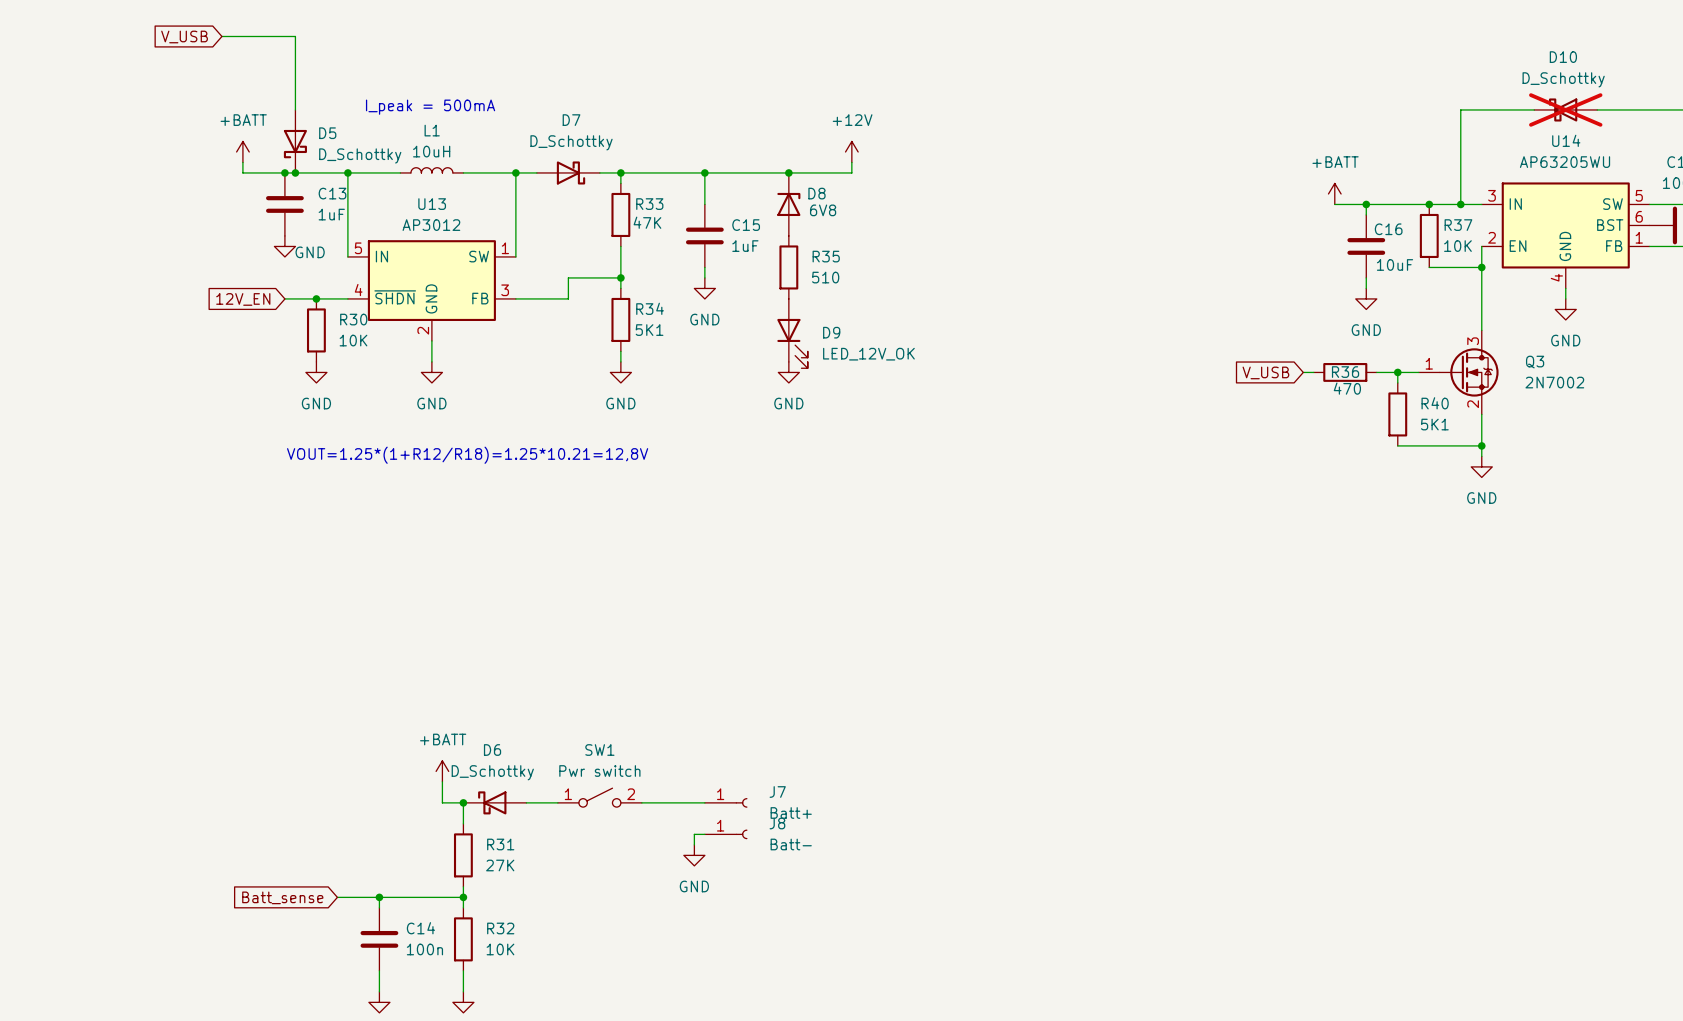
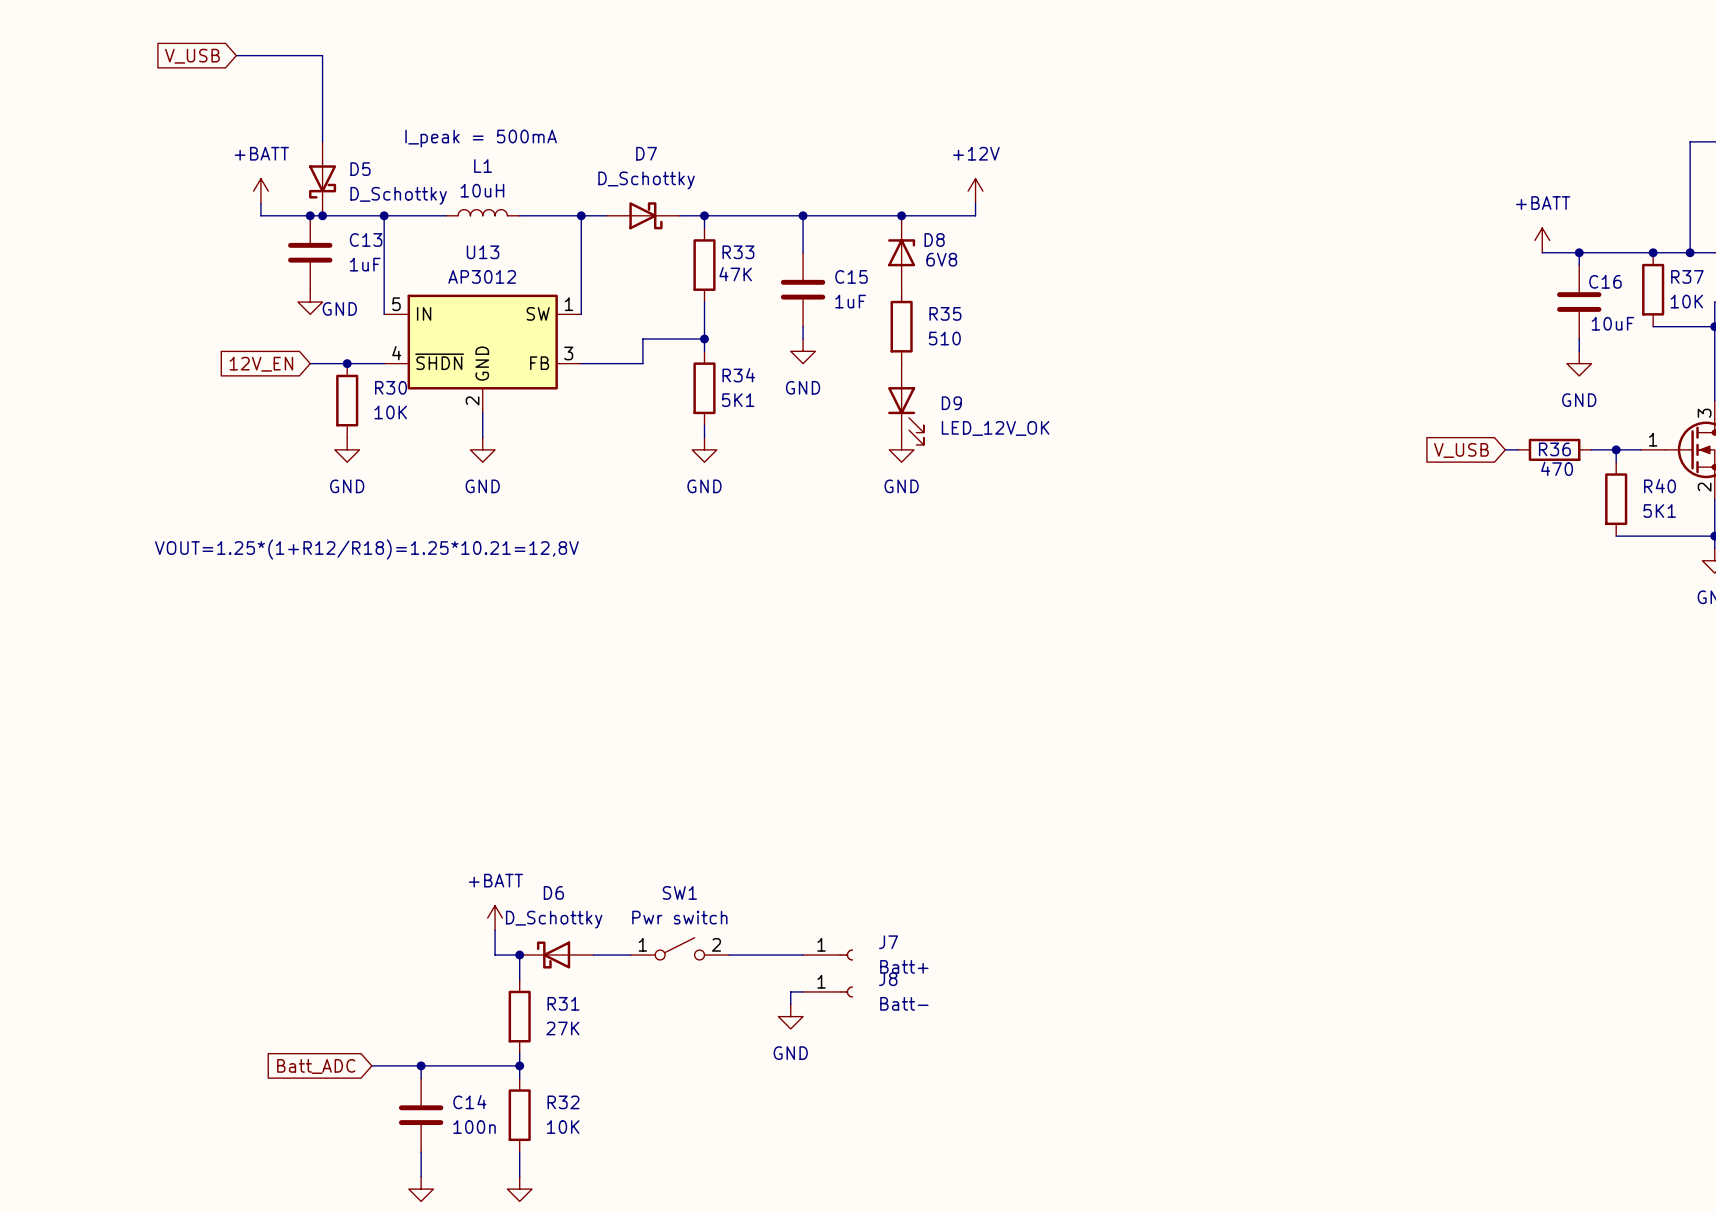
text position: VOUT=1.25*(1+R12/R18)=1.25*10.21=12,8V (467, 455) -> VOUT=1.25*(1+R12/R18)=1.25*10.21=12,8V (366, 549)
global label: Batt_sense (282, 897) -> Batt_ADC (316, 1066)

